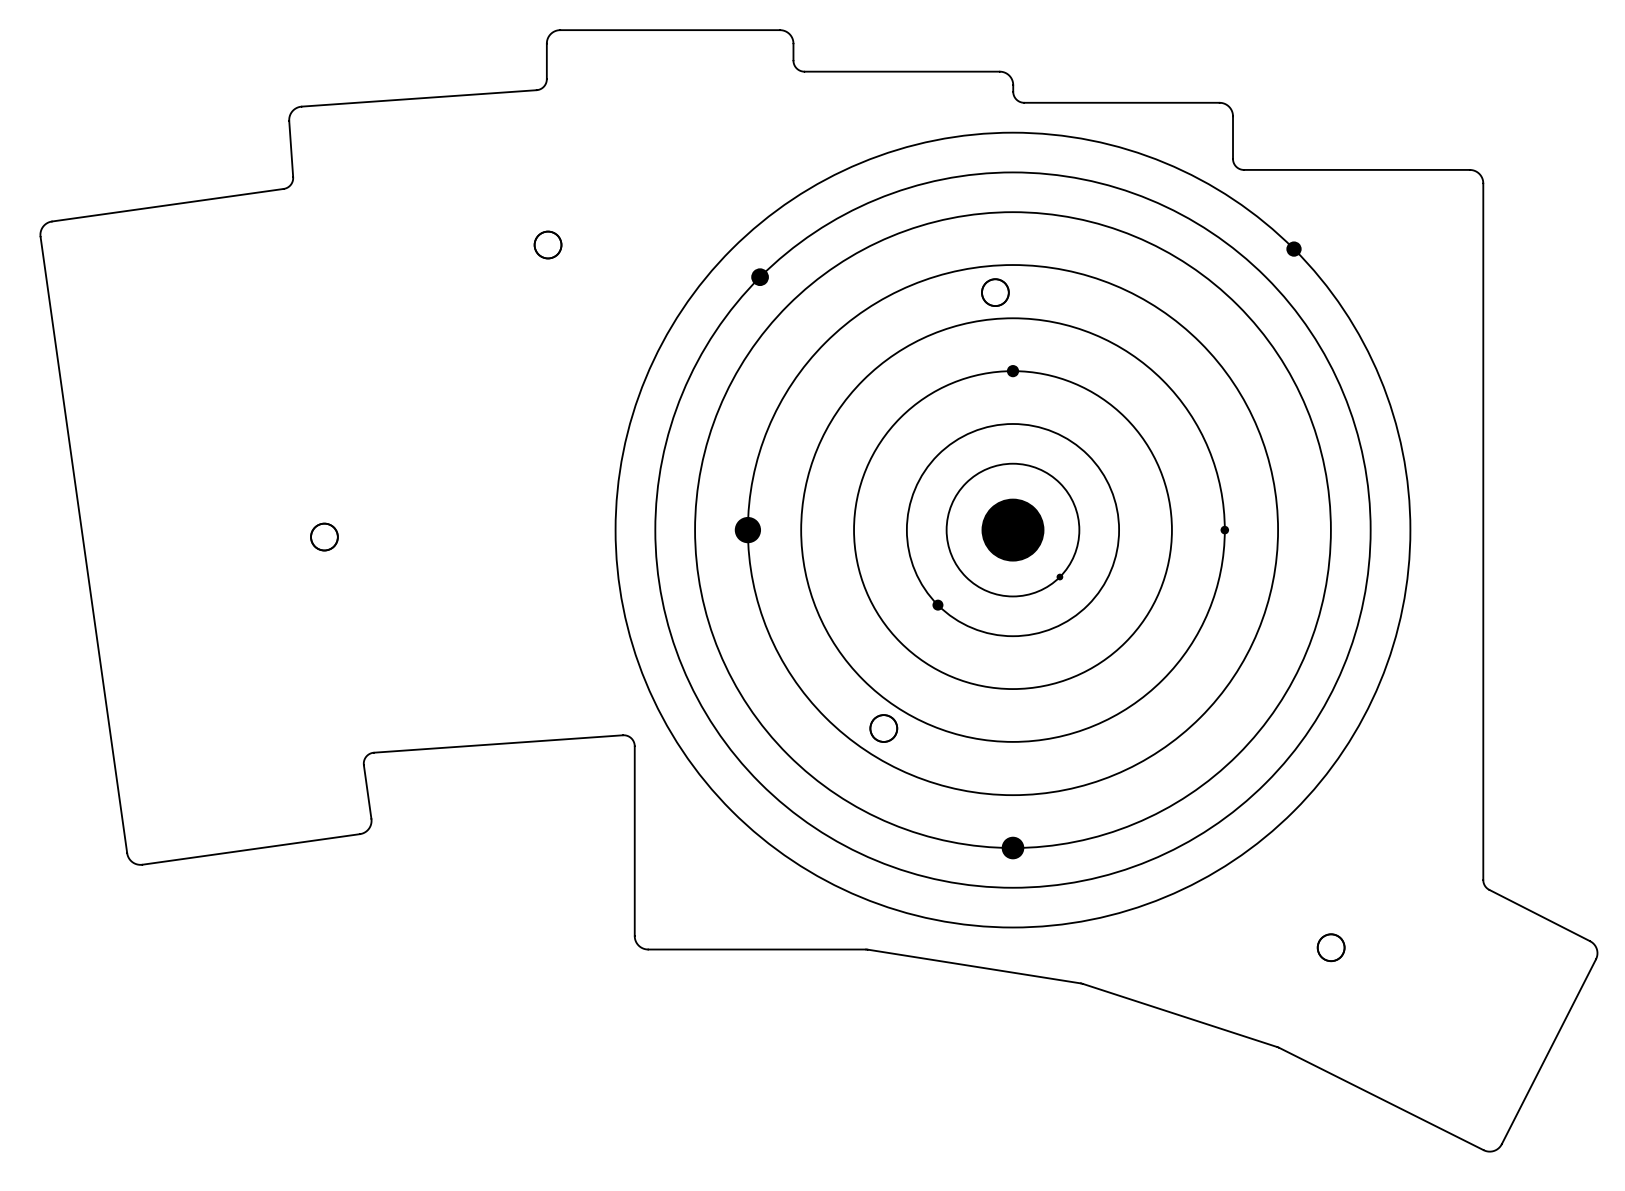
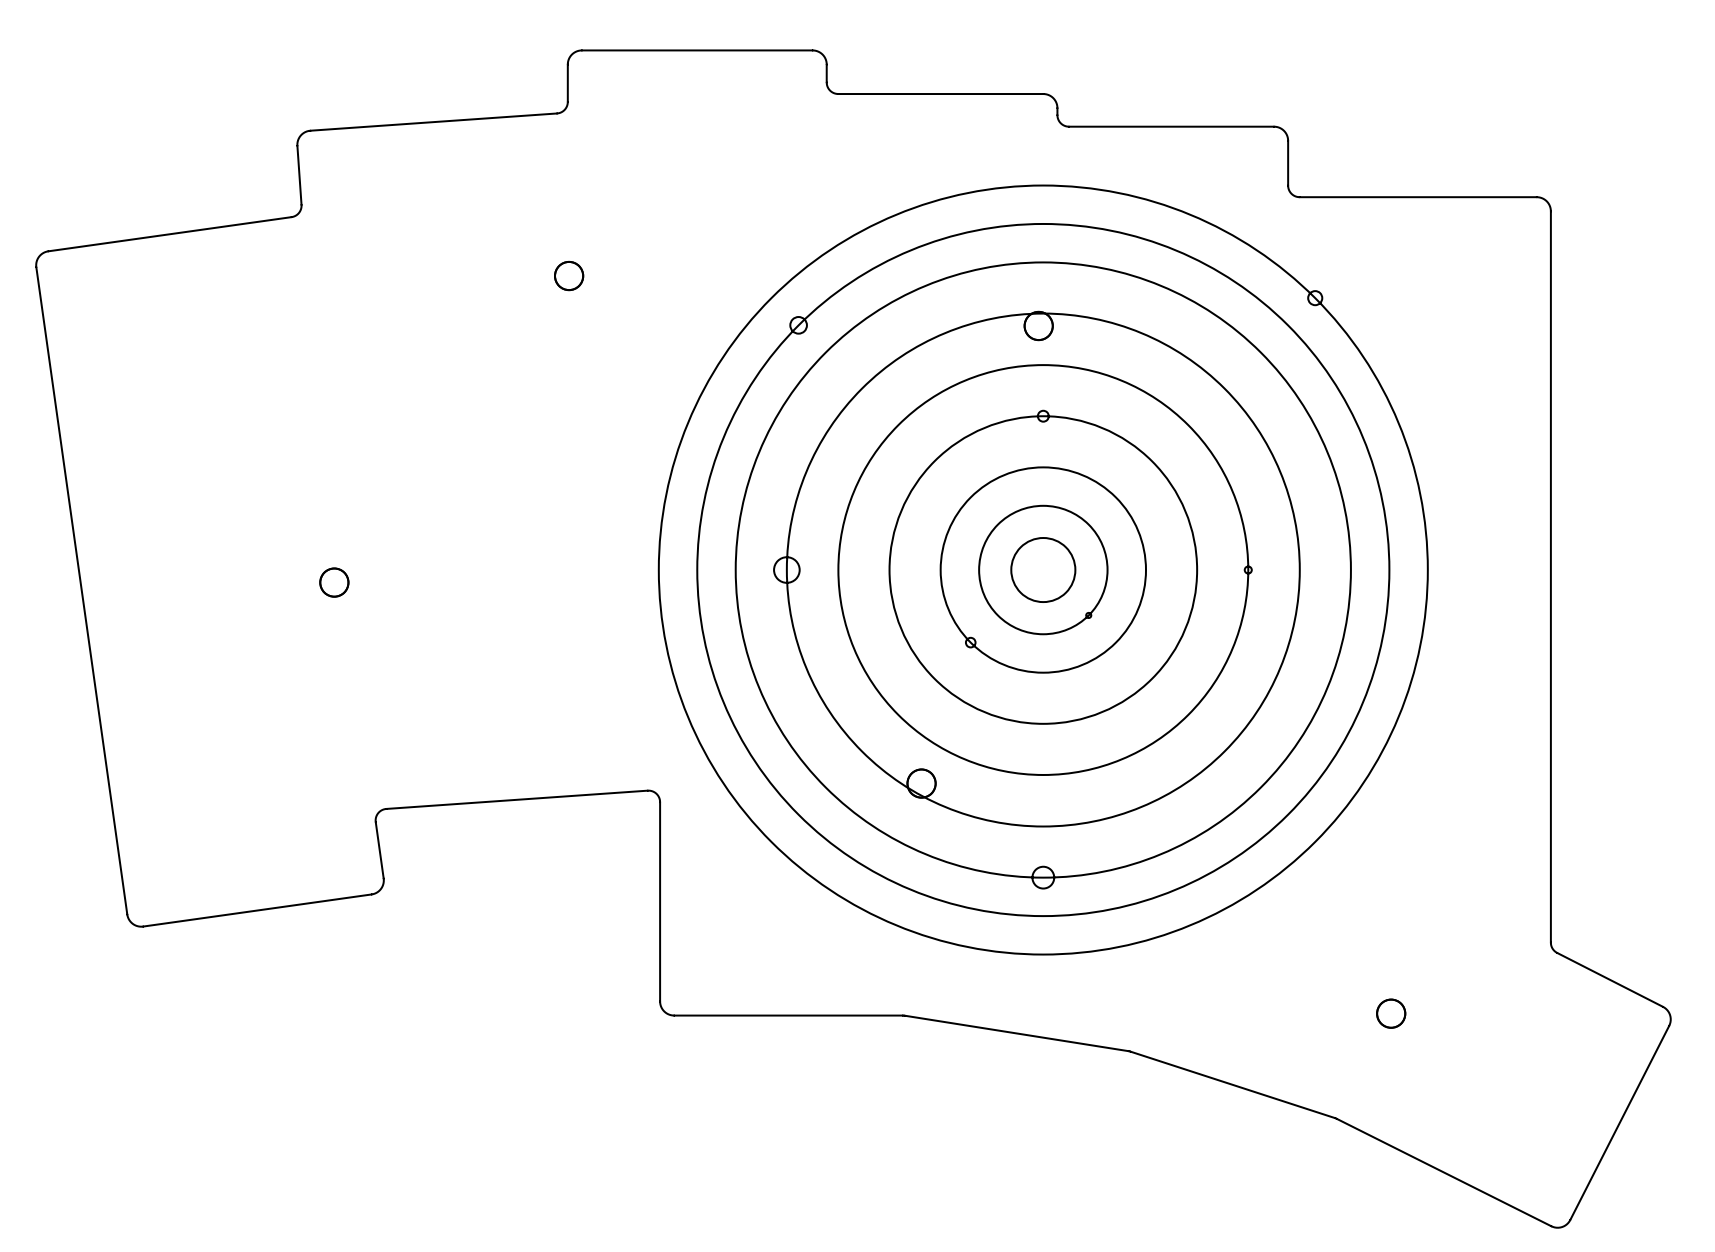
drawing: [614, 131, 1412, 929] -> none
drawing: none -> [657, 184, 1429, 956]

